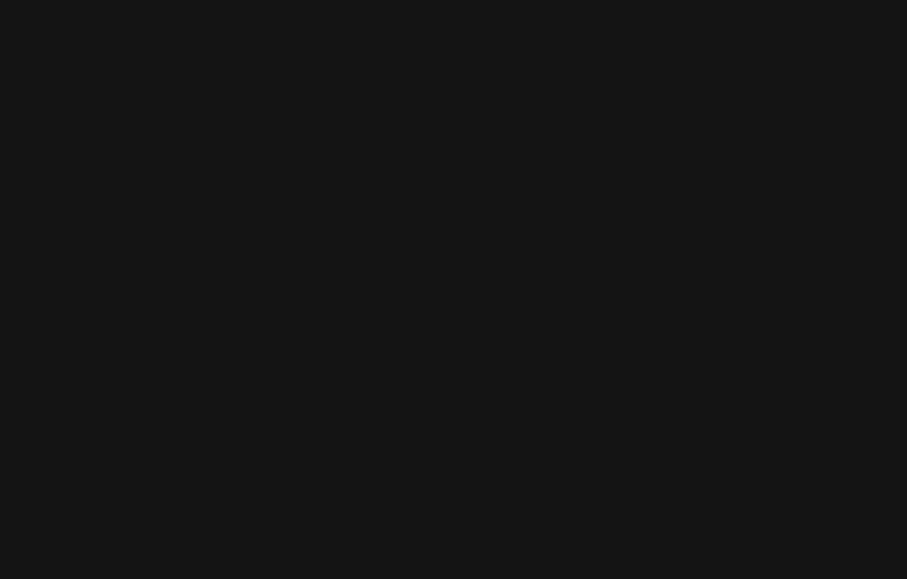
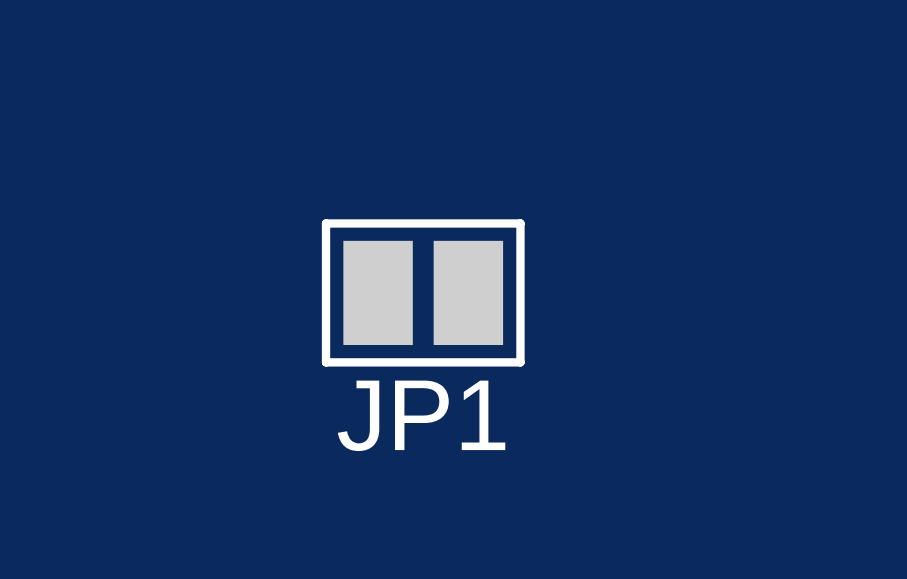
JP1: none -> (423, 292)

